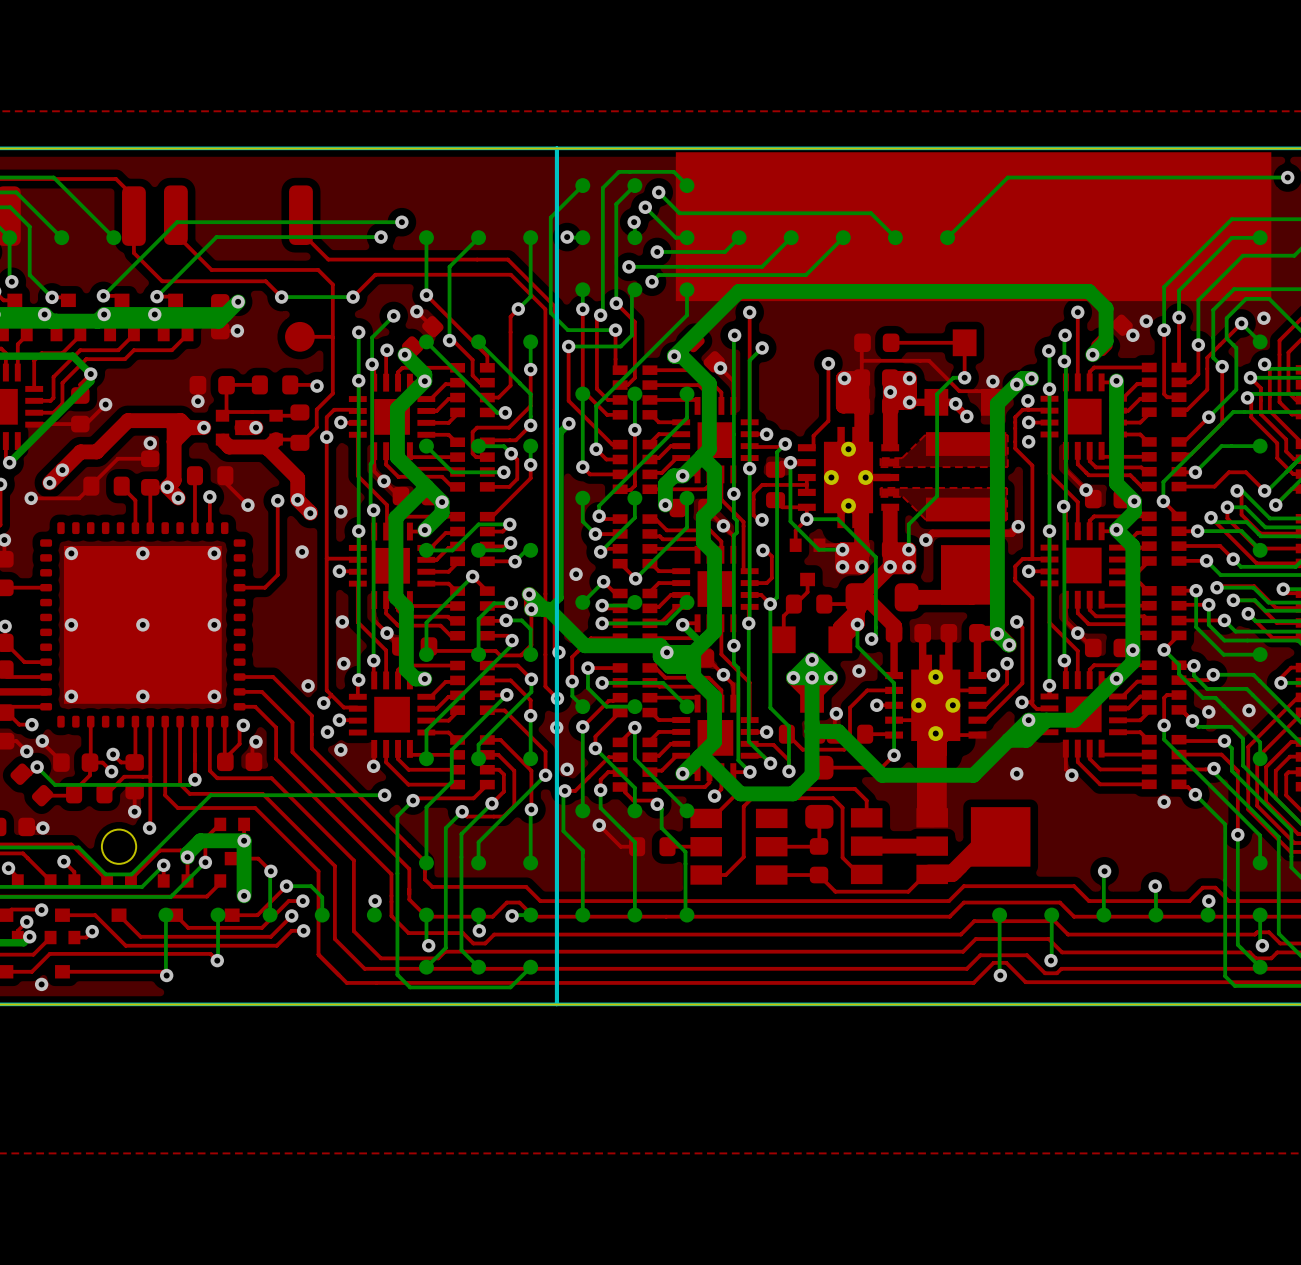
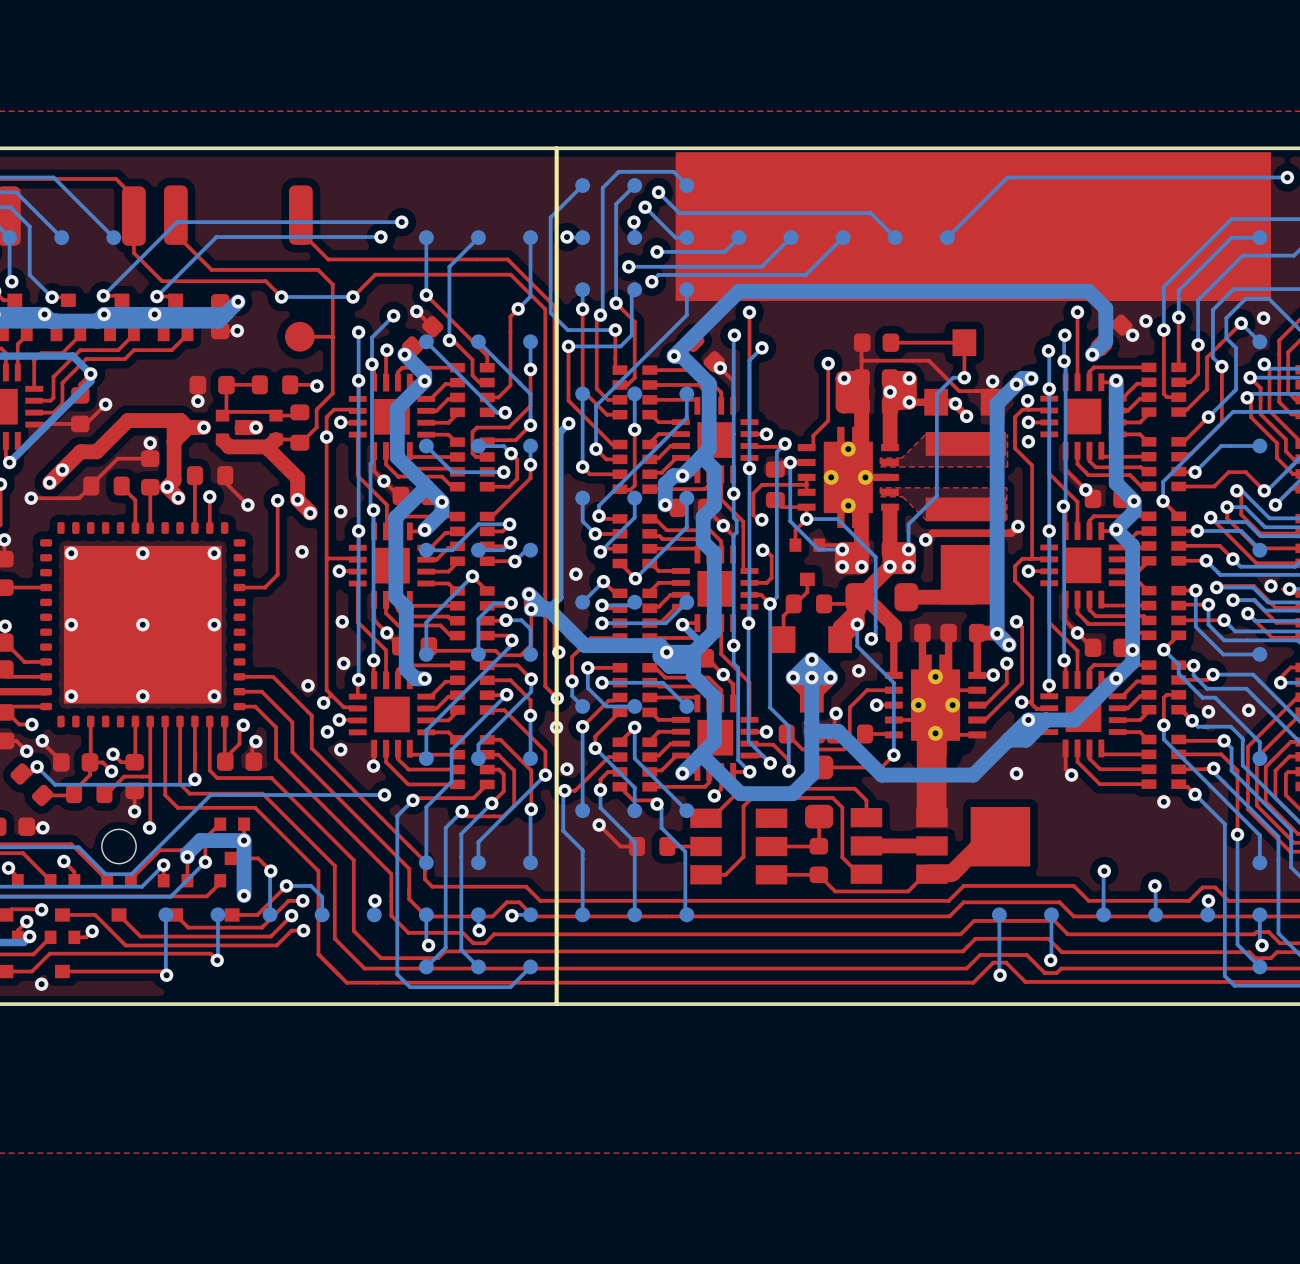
via: none -> (1271, 586)
via: (1283, 589) -> none
via: none -> (1289, 589)

